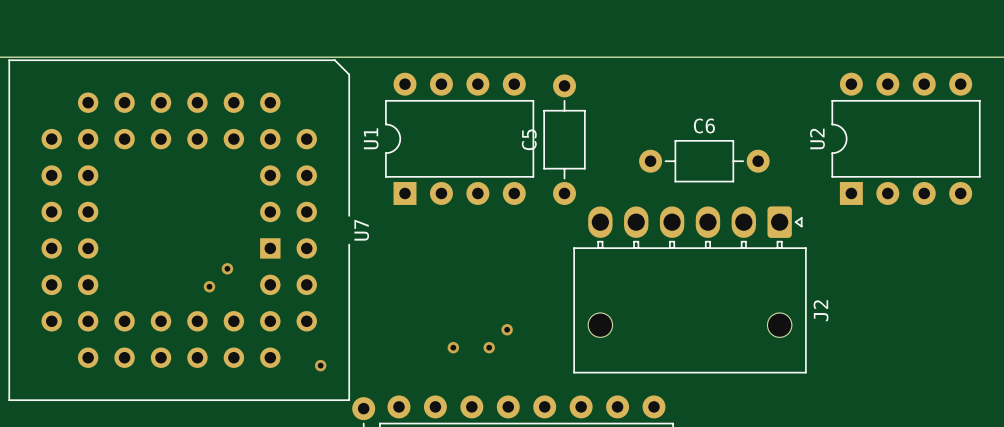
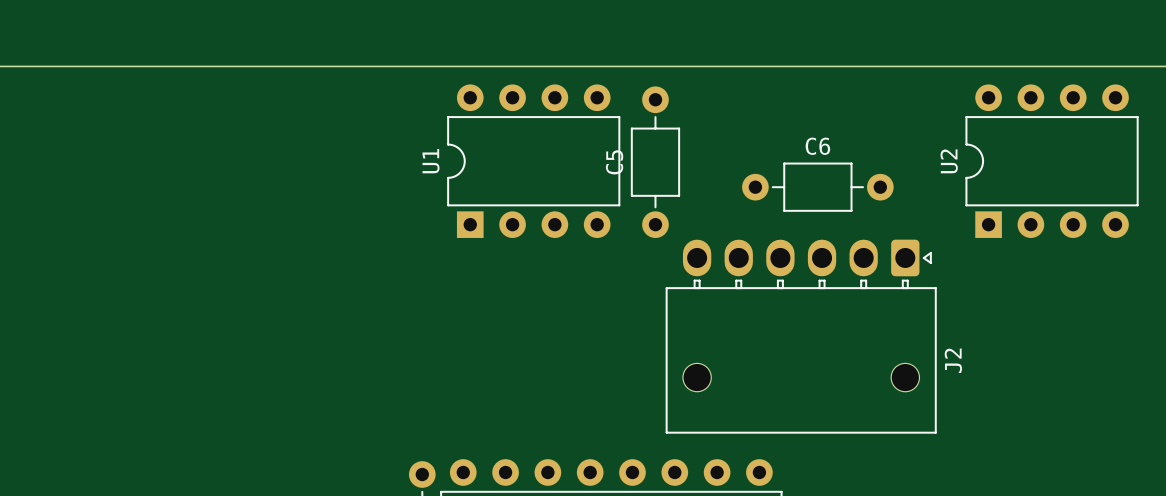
U7: (179, 230) -> none
via: (227, 268) -> none
via: (209, 286) -> none
via: (507, 329) -> none
via: (453, 347) -> none
via: (489, 347) -> none
via: (320, 365) -> none

